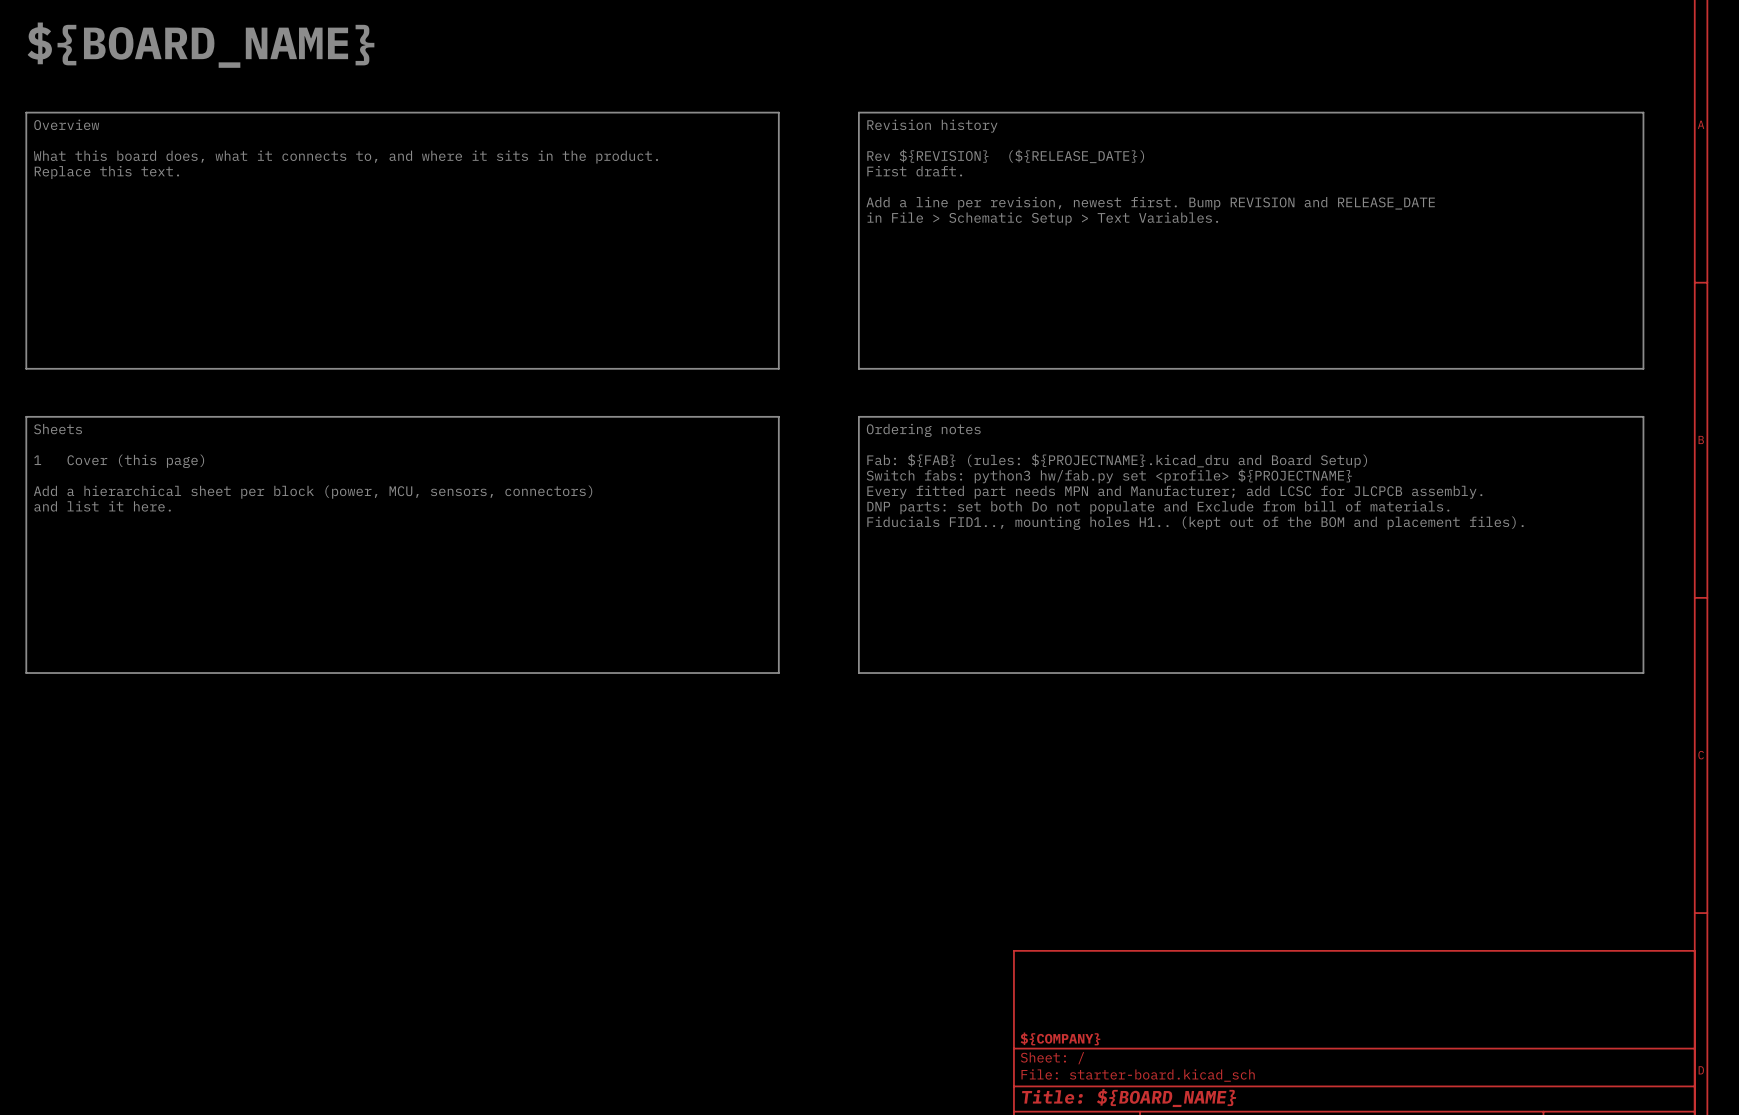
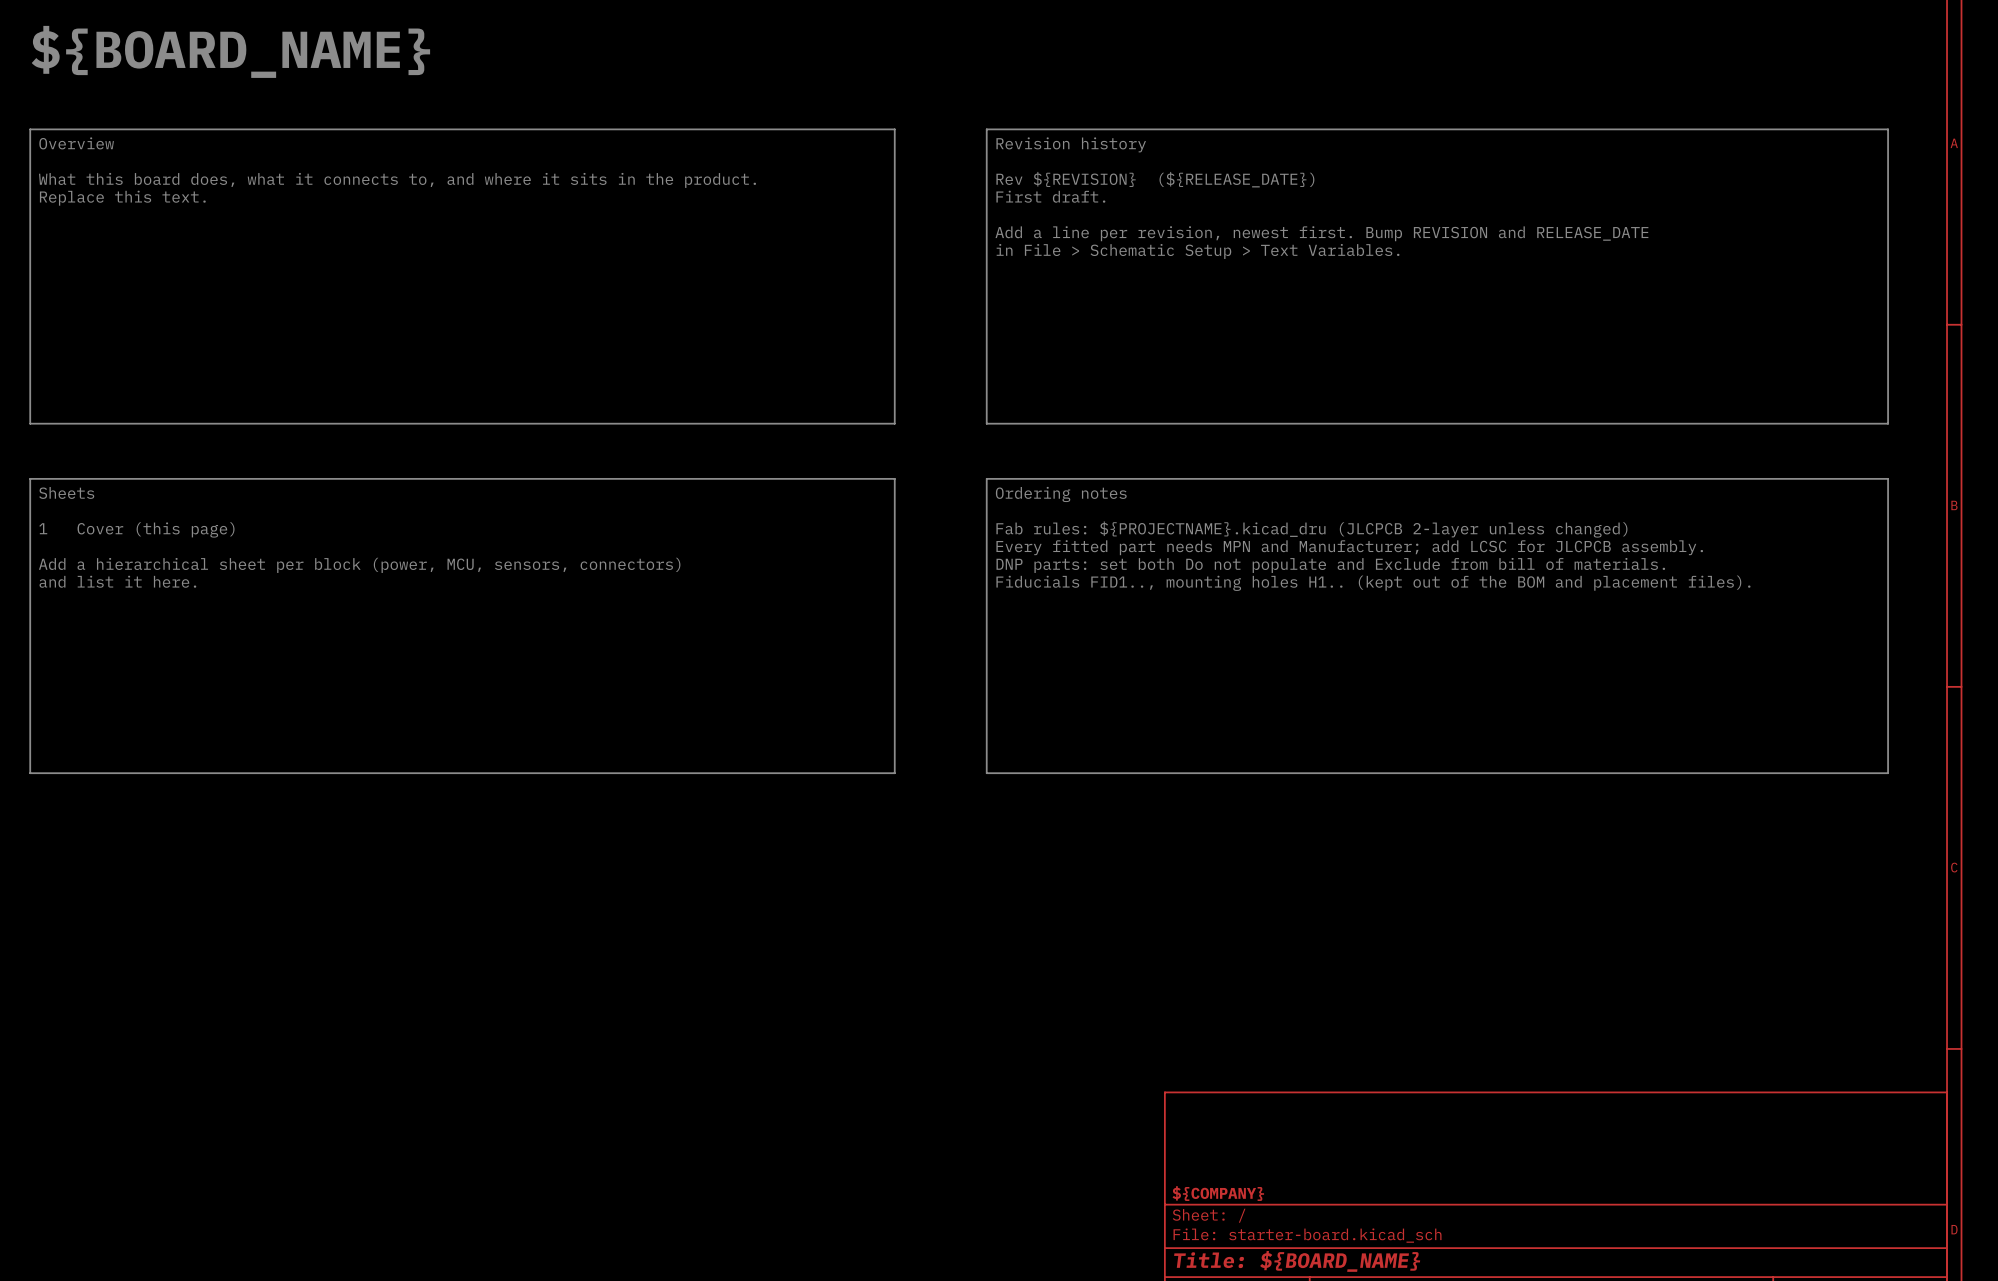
text: Fab: ${FAB} (rules: ${PROJECTNAME}.kicad_dru and Board Setup) (1117, 460) -> Fab rules: ${PROJECTNAME}.kicad_dru (JLCPCB 2-layer unless changed) (1311, 529)
text: Switch fabs: python3 hw/fab.py set <profile> ${PROJECTNAME} (1109, 476) -> Every fitted part needs MPN and Manufacturer; add LCSC for JLCPCB assembly. (1349, 547)
text: Every fitted part needs MPN and Manufacturer; add LCSC for JLCPCB assembly. (1174, 492) -> DNP parts: set both Do not populate and Exclude from bill of materials. (1330, 565)
text: DNP parts: set both Do not populate and Exclude from bill of materials. (1158, 507) -> Fiducials FID1.., mounting holes H1.. (kept out of the BOM and placement files). (1373, 583)
text: Fiducials FID1.., mounting holes H1.. (kept out of the BOM and placement files). (1195, 523) -> none

